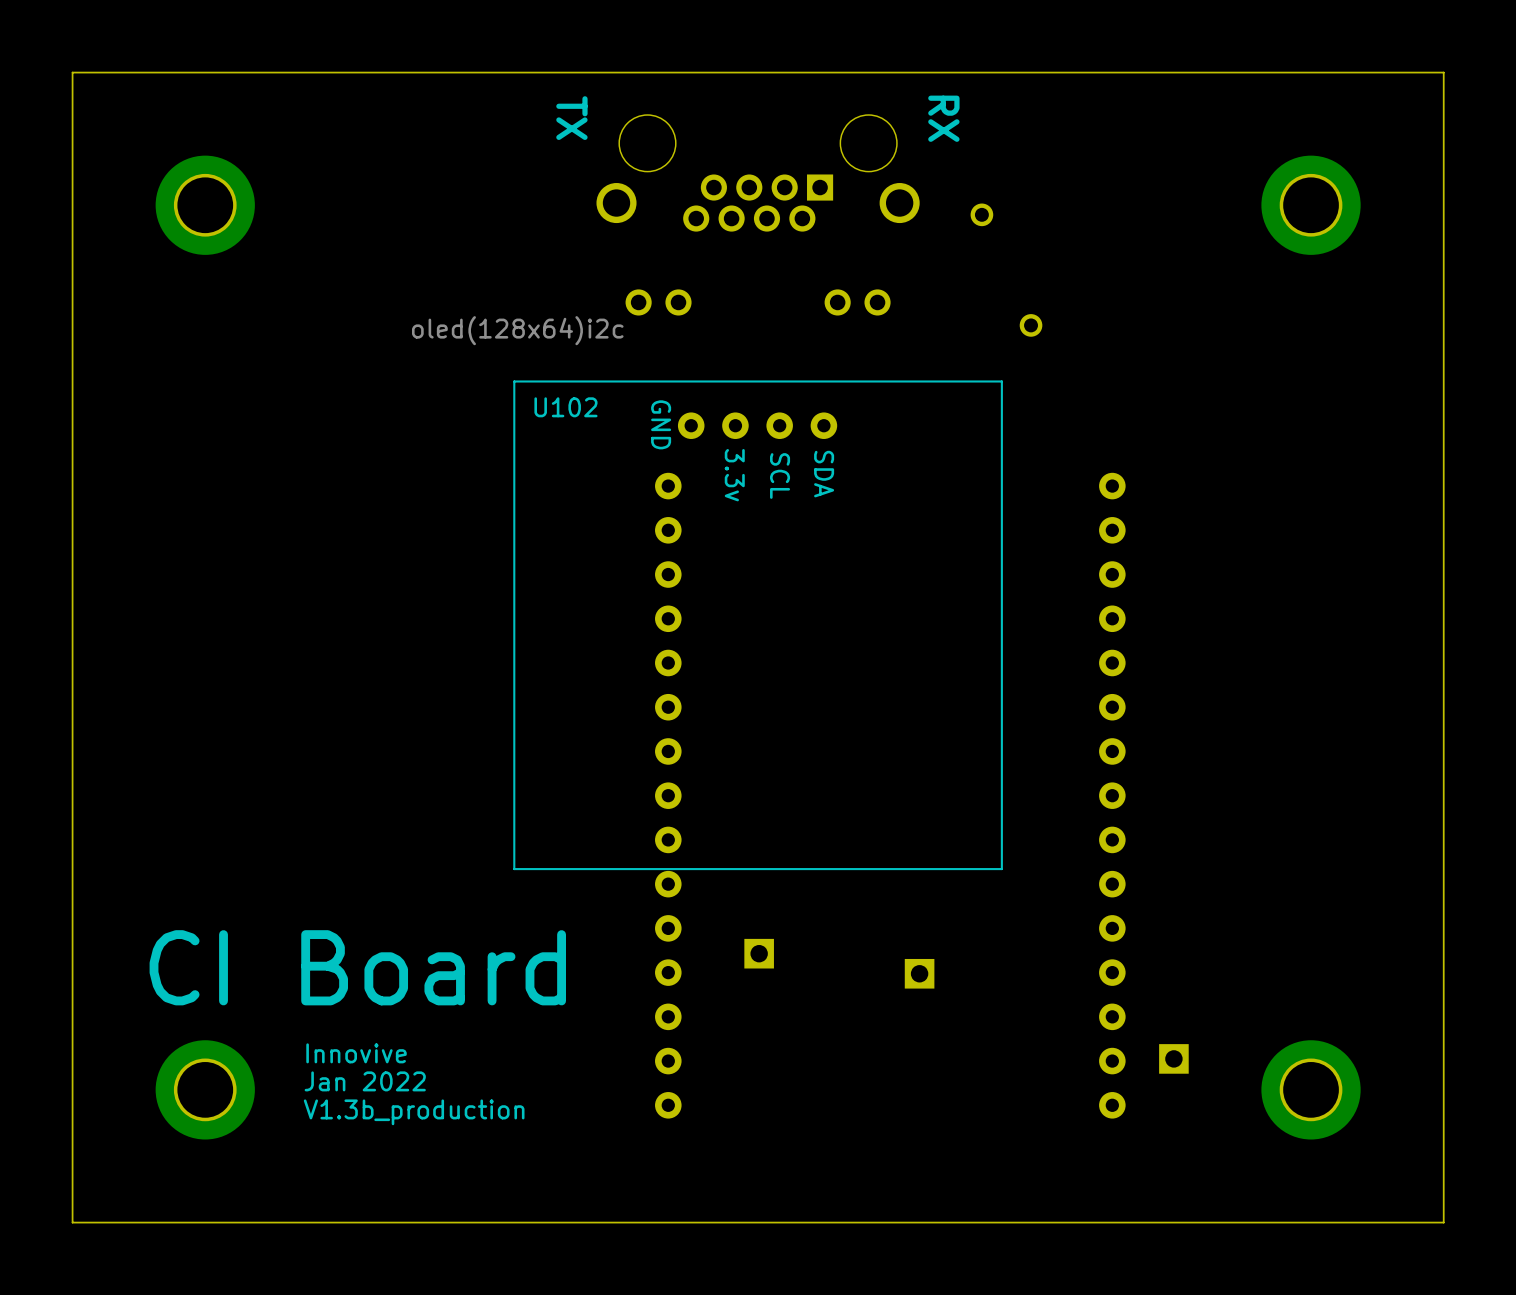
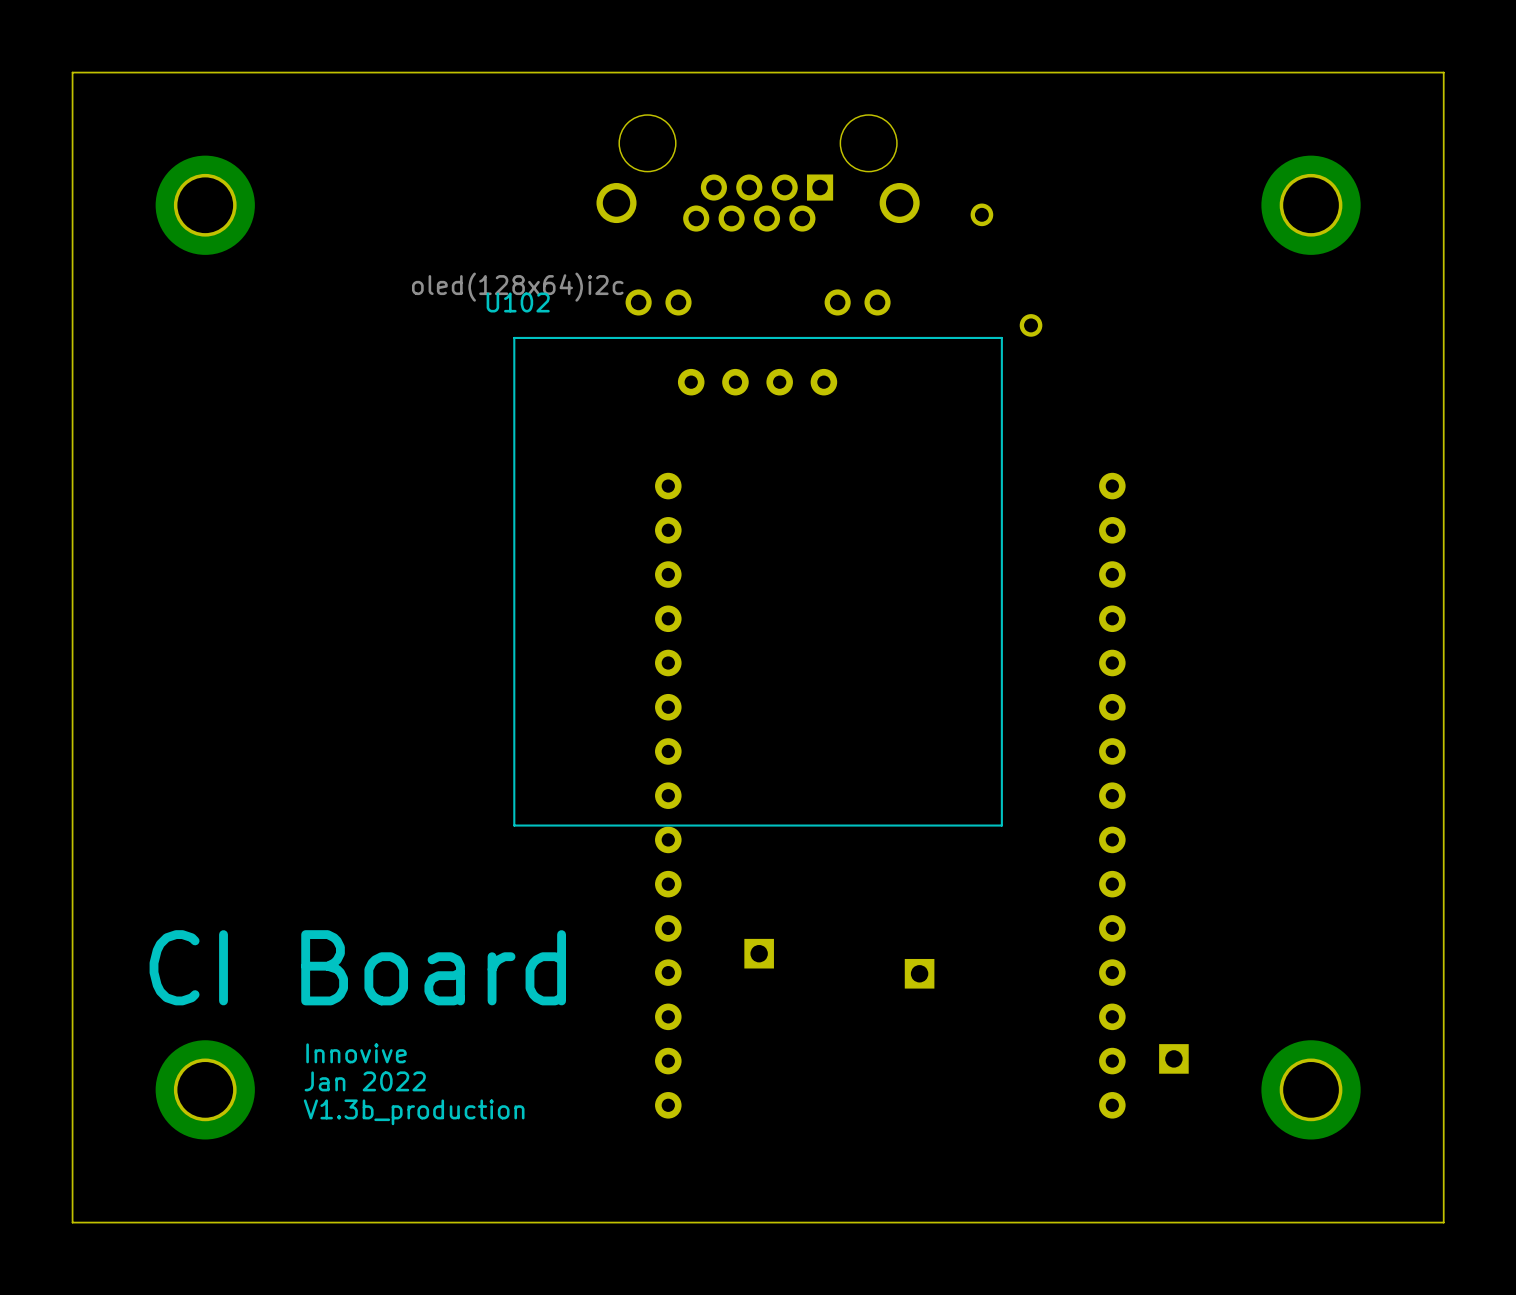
text: TX (571, 118) -> none
text: RX (943, 118) -> none
U102 name position: U102 (565, 407) -> U102 (518, 302)
text: GND (661, 424) -> none
text: SDA (824, 474) -> none
text: 3.3v (734, 475) -> none
text: SCL (780, 476) -> none
U102 position: (758, 625) -> (758, 581)

